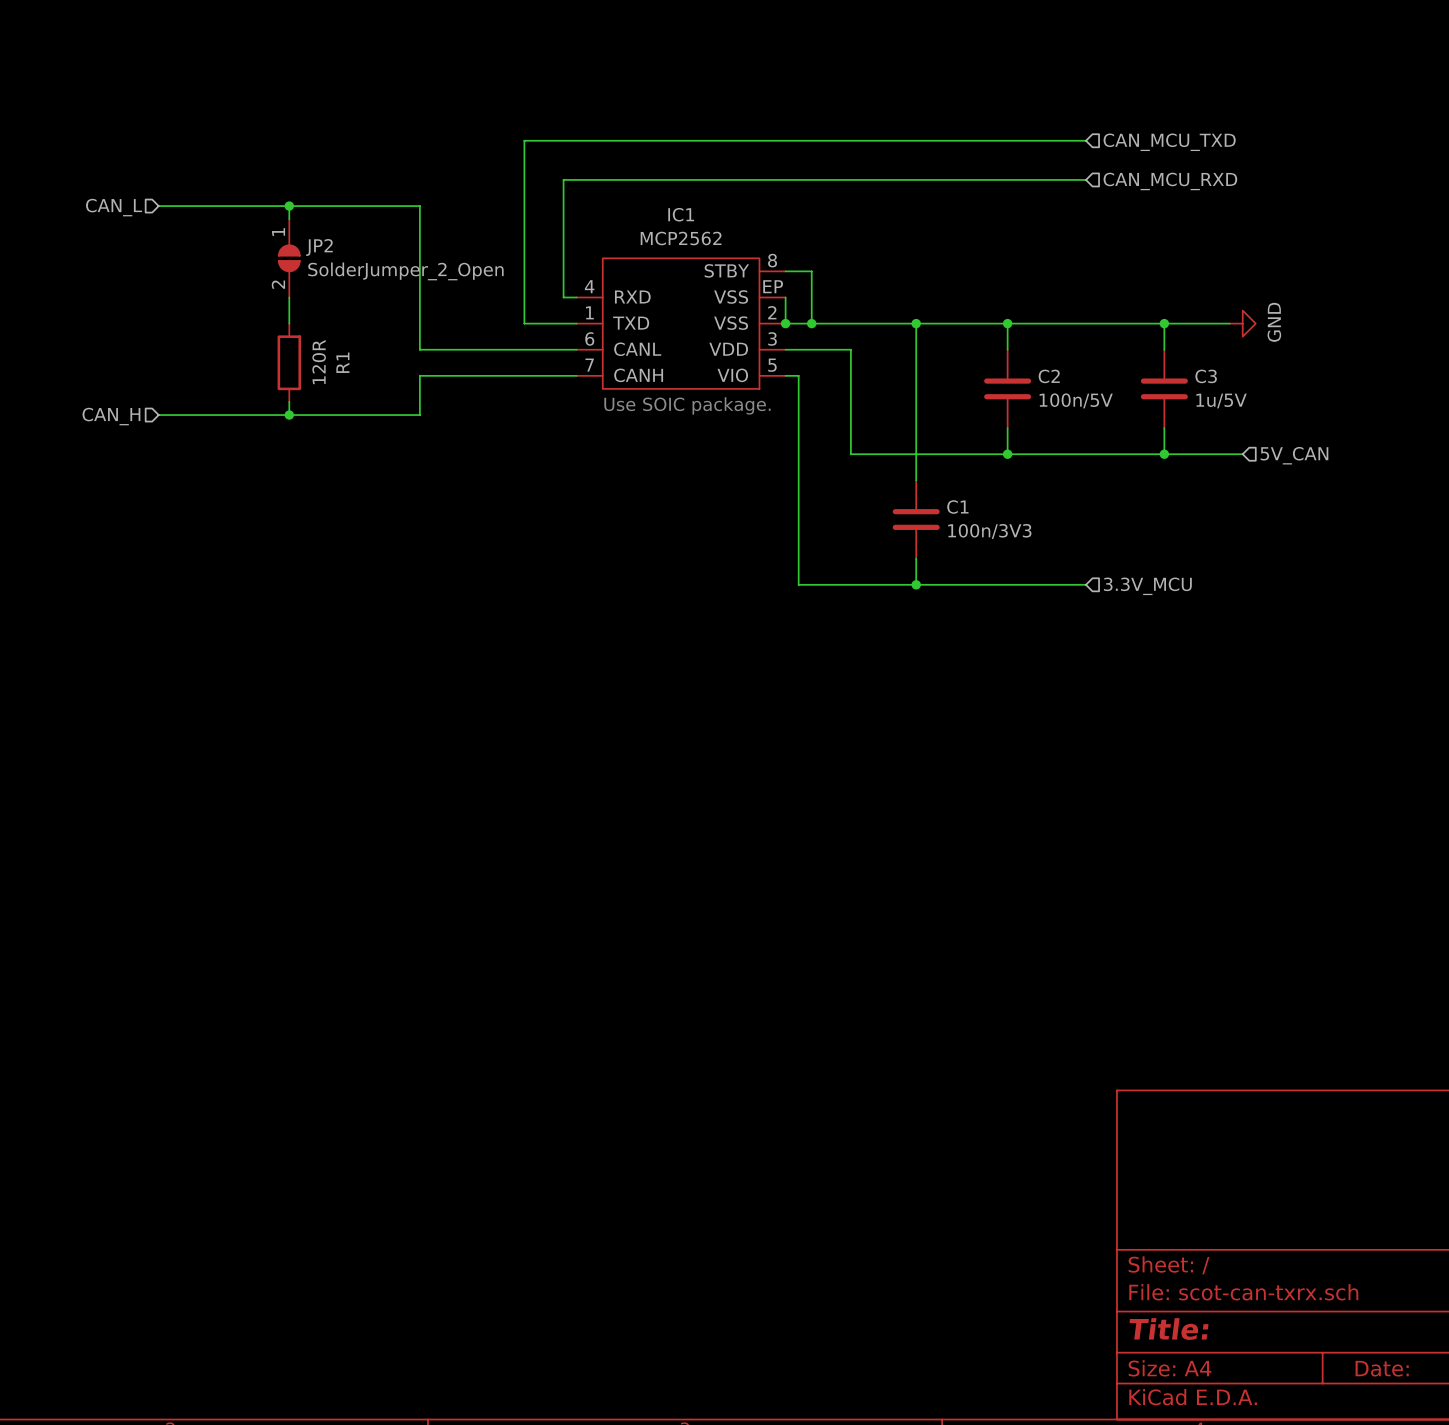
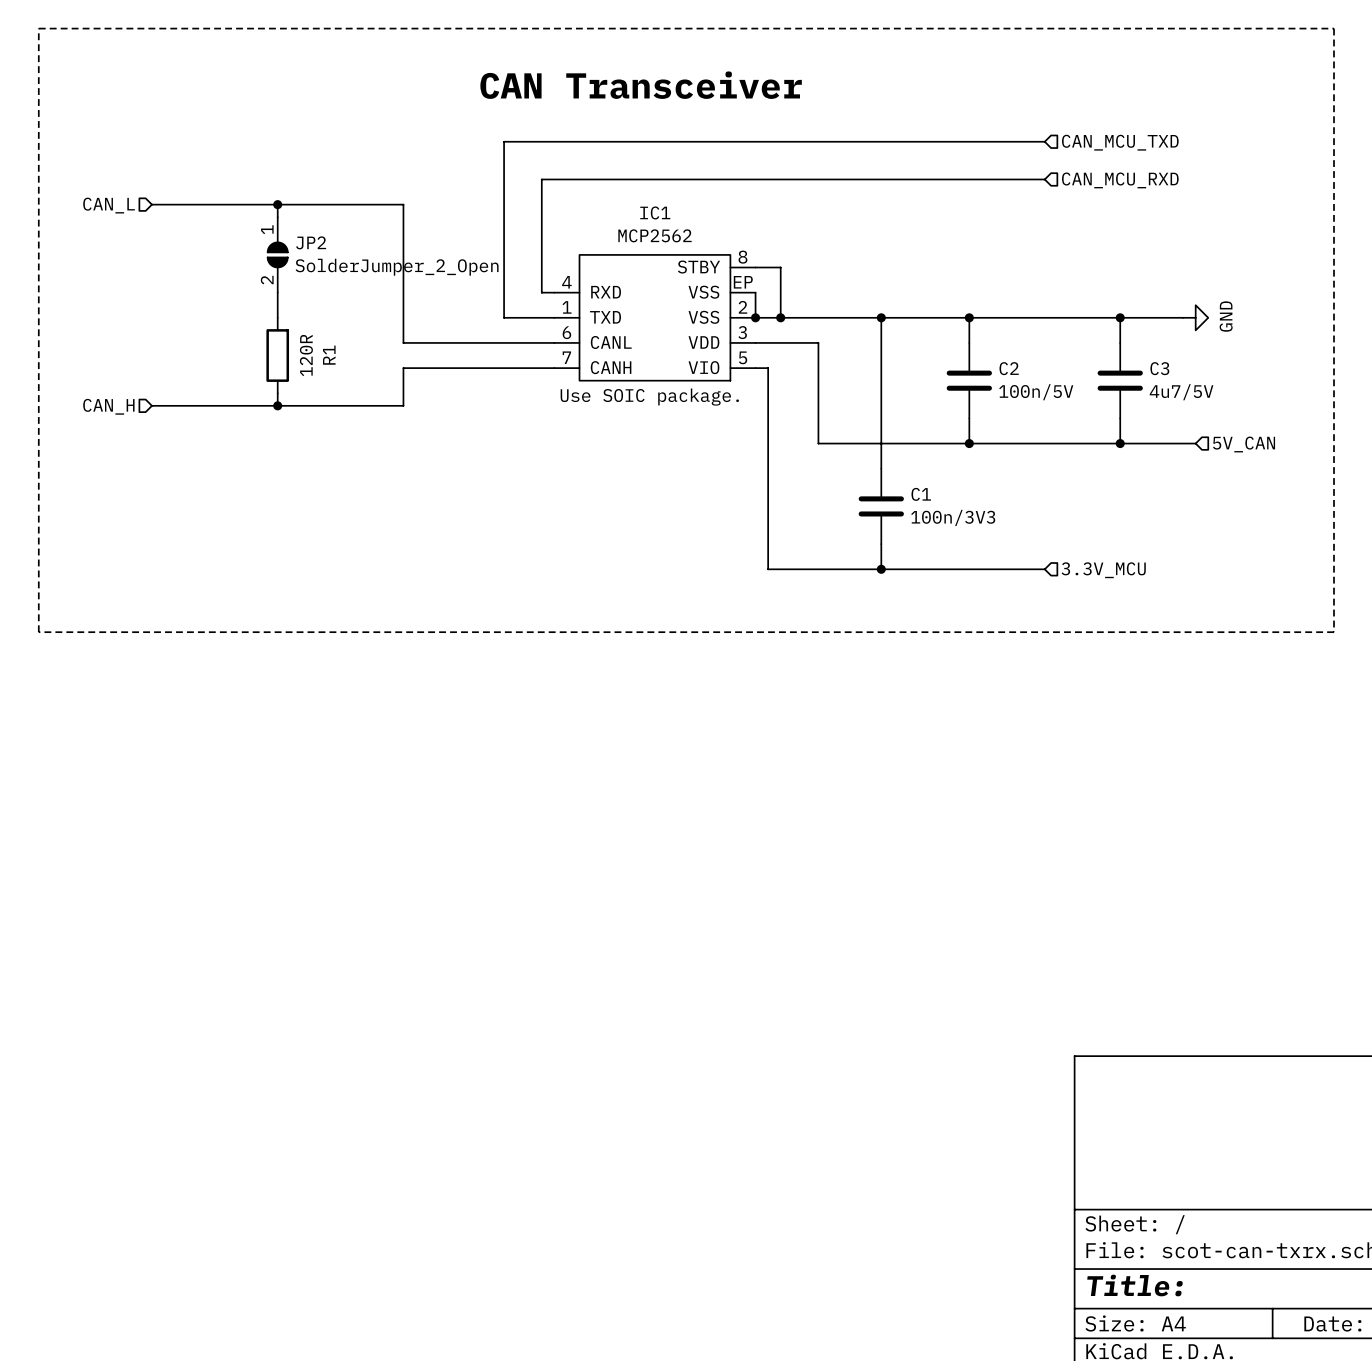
line: none -> (38, 28) (1334, 28) (1334, 632) (38, 632) (38, 28)
text: none -> CAN Transceiver (641, 85)
C3 value: 1u/5V (1221, 401) -> 4u7/5V (1181, 392)

